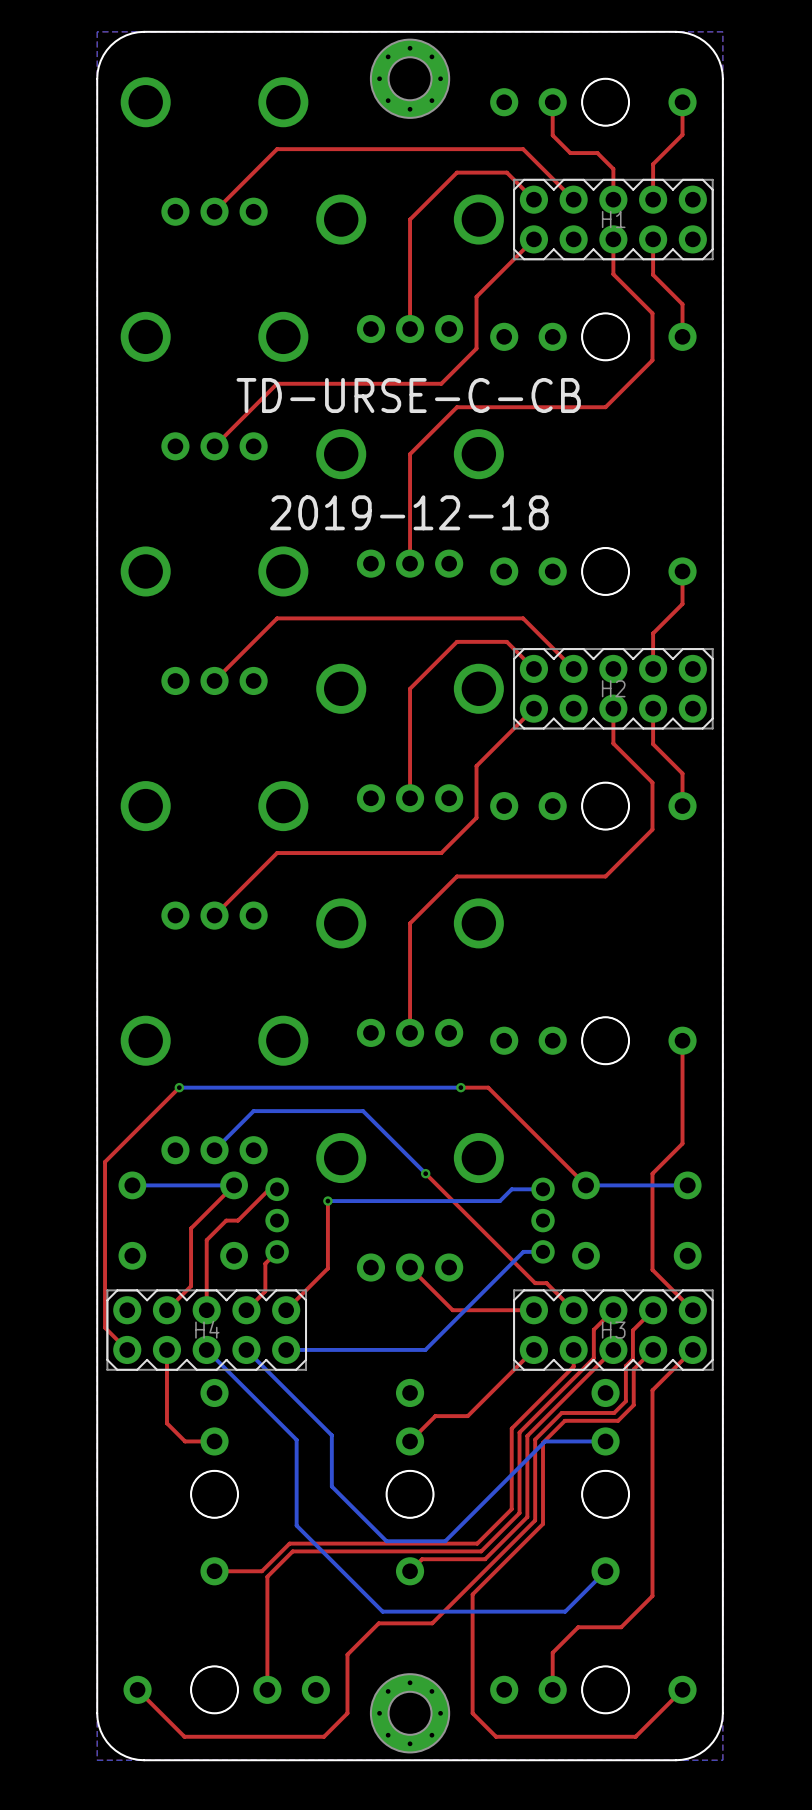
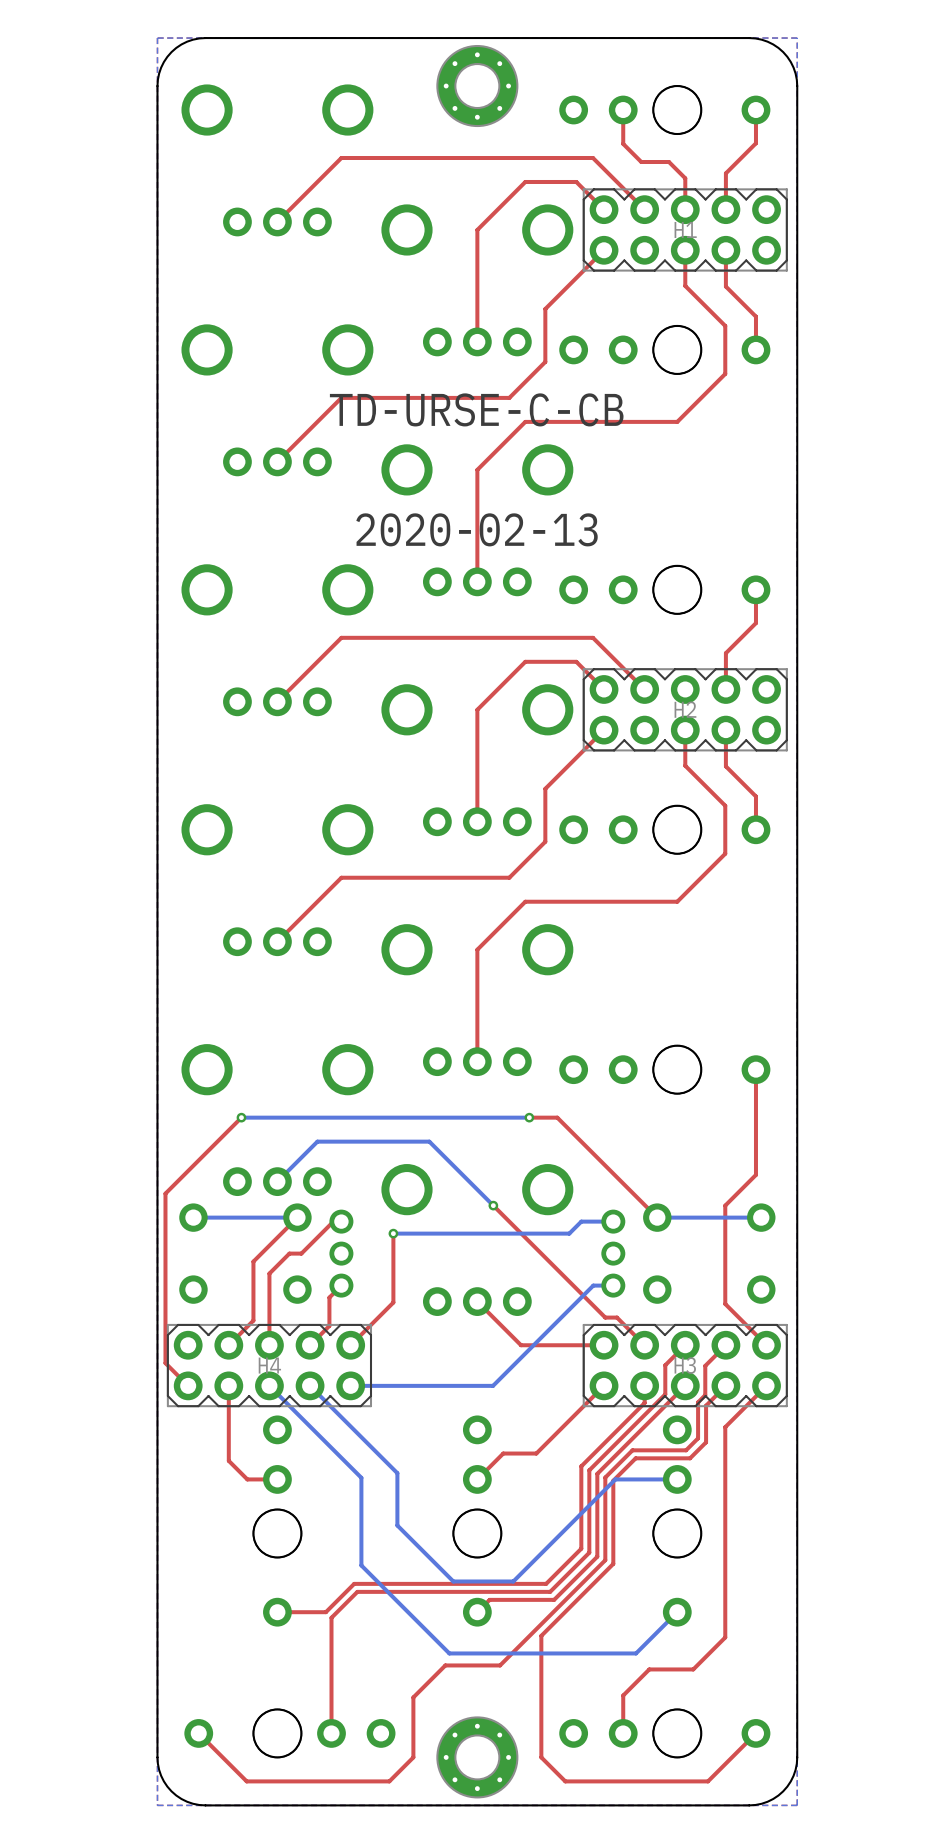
text: 2019-12-18 (409, 512) -> 2020-02-13 (477, 529)

